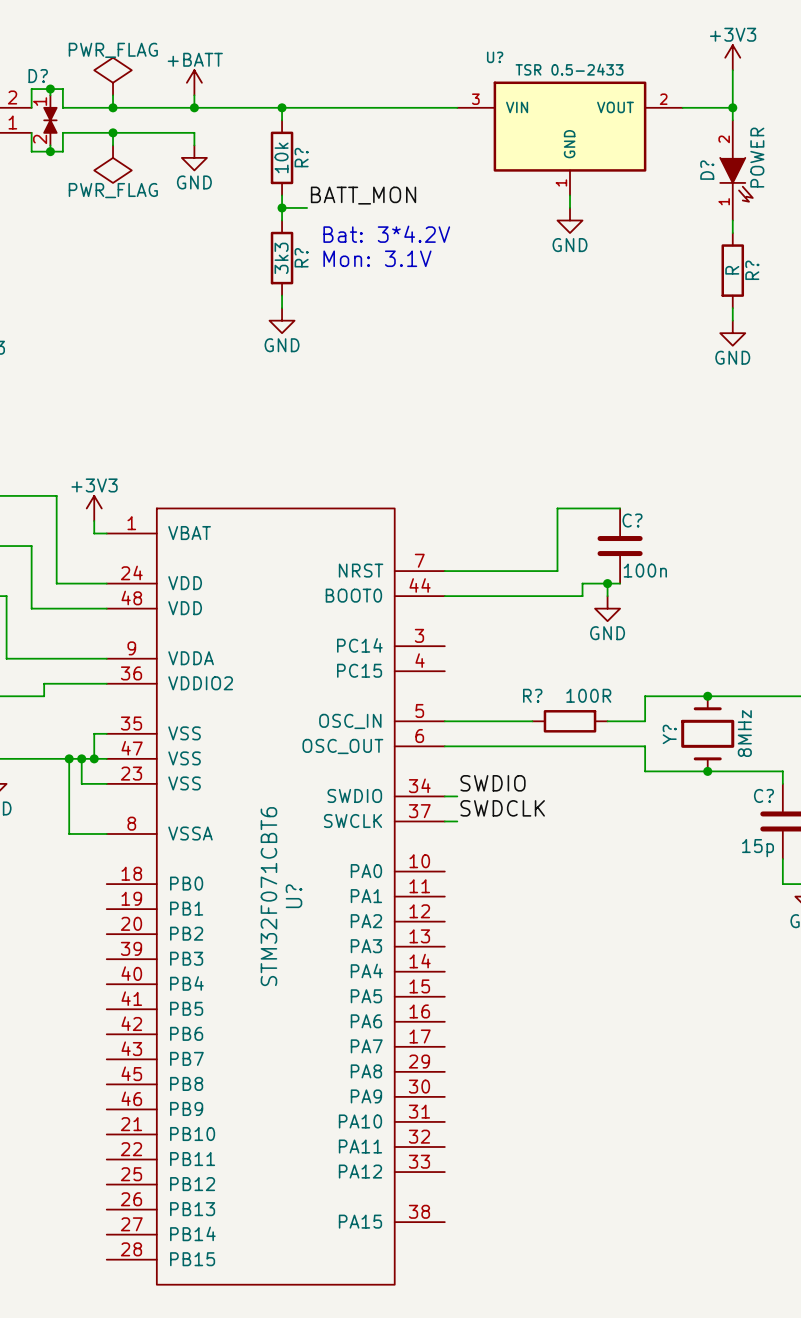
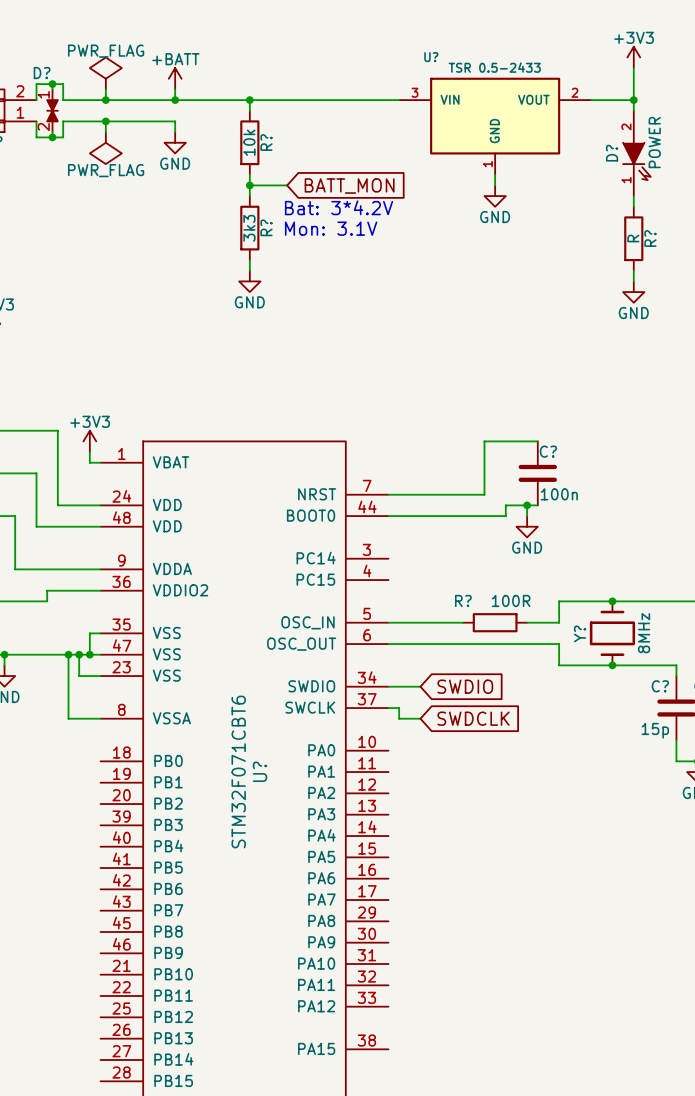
label: BATT_MON (363, 195) -> none
wire: none -> (271, 185) (287, 185)
global label: none -> BATT_MON (349, 186)
label: SWDIO (493, 783) -> none
wire: none -> (399, 686) (420, 686)
global label: none -> SWDIO (465, 686)
label: SWDCLK (502, 808) -> none
wire: none -> (399, 708) (399, 718) (420, 718)
global label: none -> SWDCLK (473, 718)

